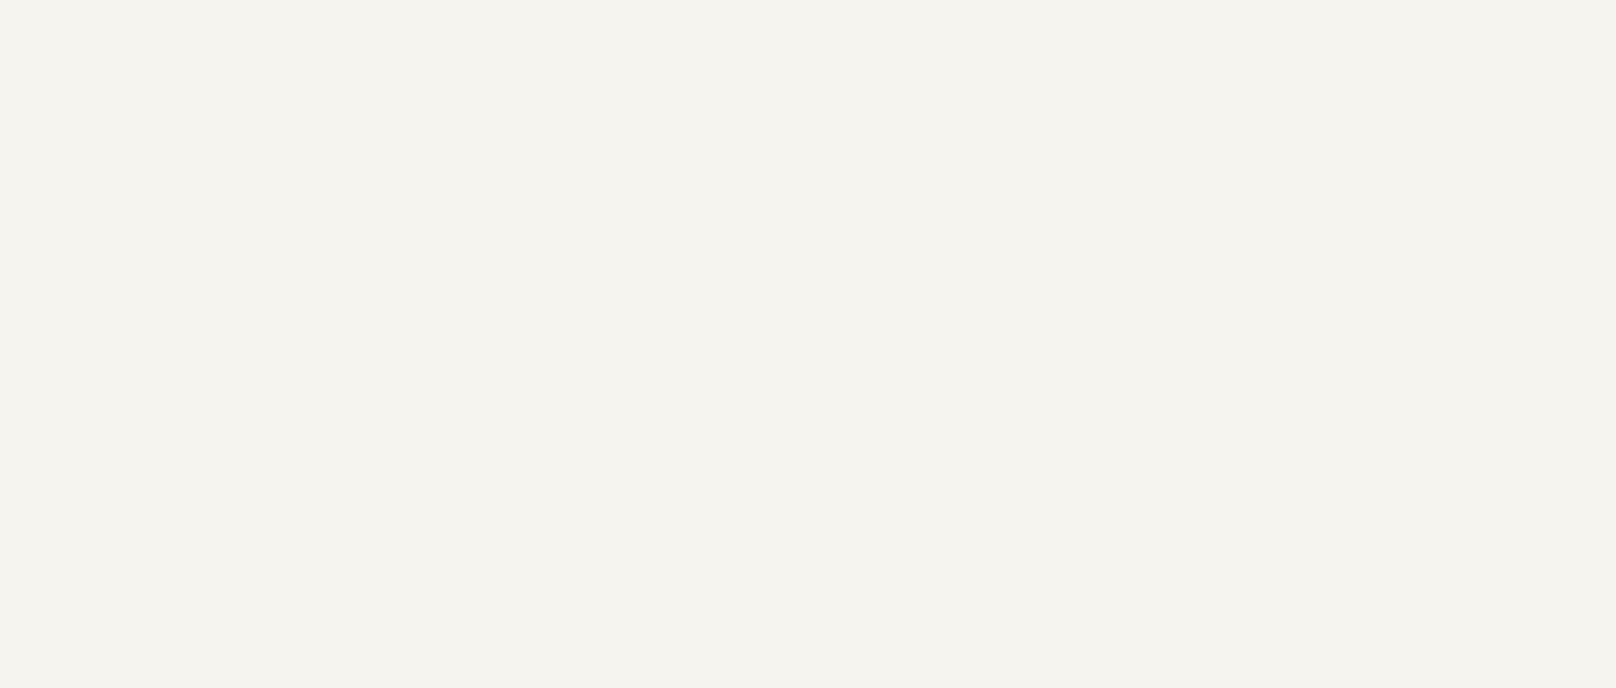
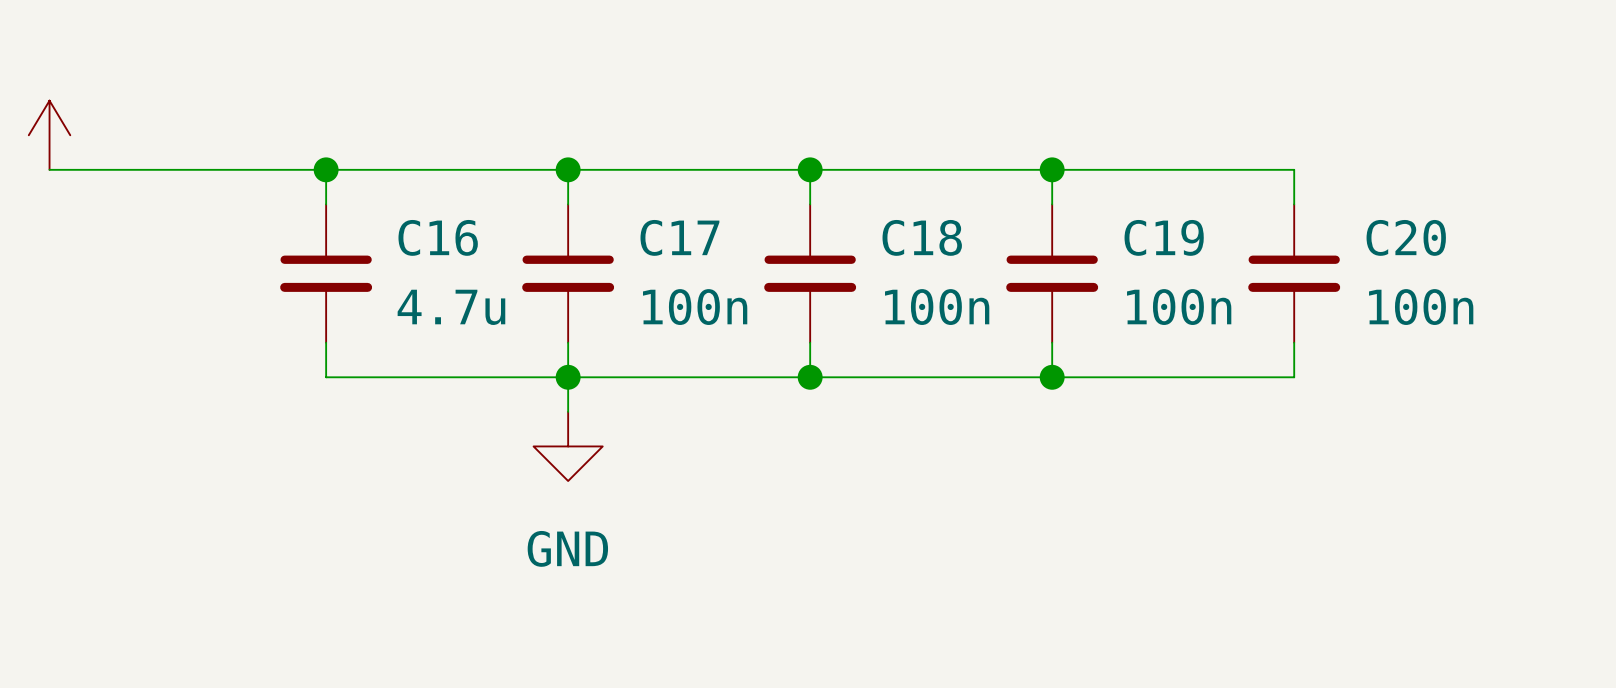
power symbol: none -> (49, 135)
wire: none -> (49, 169) (1294, 169) (1294, 204)
wire: none -> (326, 169) (326, 204)
junction: none -> (326, 169)
wire: none -> (568, 169) (568, 204)
junction: none -> (568, 169)
wire: none -> (810, 169) (810, 204)
junction: none -> (810, 169)
wire: none -> (1052, 169) (1052, 204)
junction: none -> (1052, 169)
C16: none -> 4.7u (326, 273)
C17: none -> 100n (568, 273)
C18: none -> 100n (810, 273)
C19: none -> 100n (1052, 273)
C20: none -> 100n (1294, 273)
wire: none -> (326, 342) (326, 377) (1294, 377) (1294, 342)
wire: none -> (568, 342) (568, 411)
wire: none -> (810, 342) (810, 377)
wire: none -> (1052, 342) (1052, 377)
junction: none -> (568, 377)
junction: none -> (810, 377)
junction: none -> (1052, 377)
power symbol: none -> GND (568, 446)

